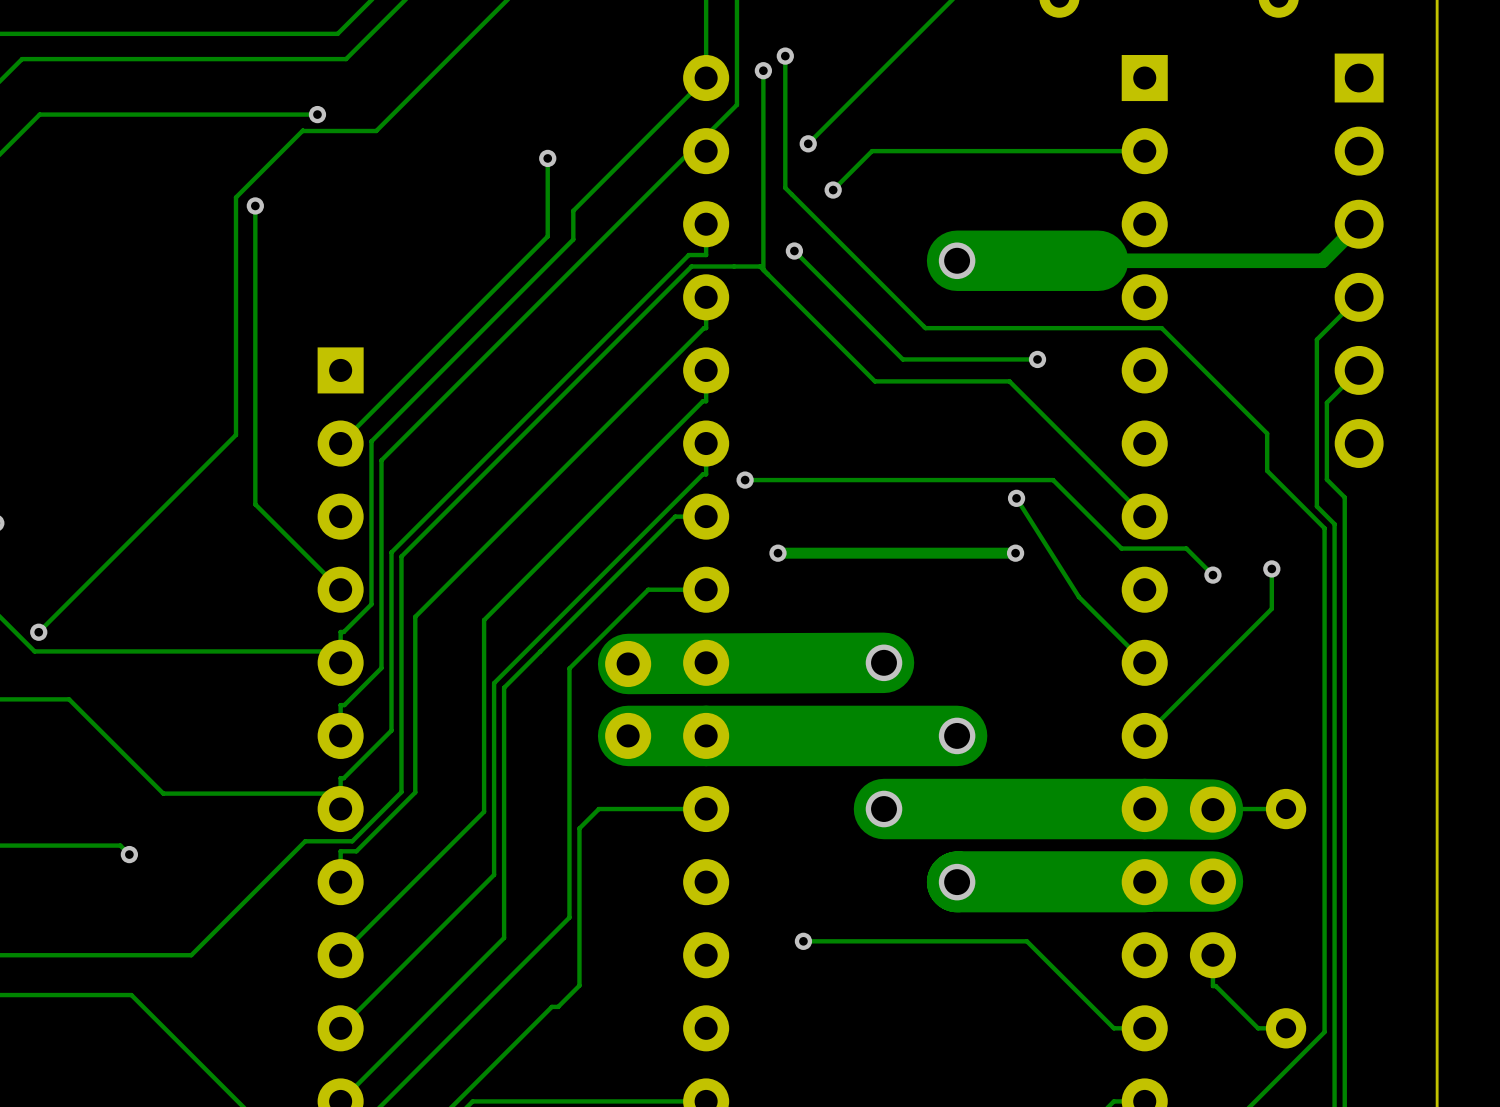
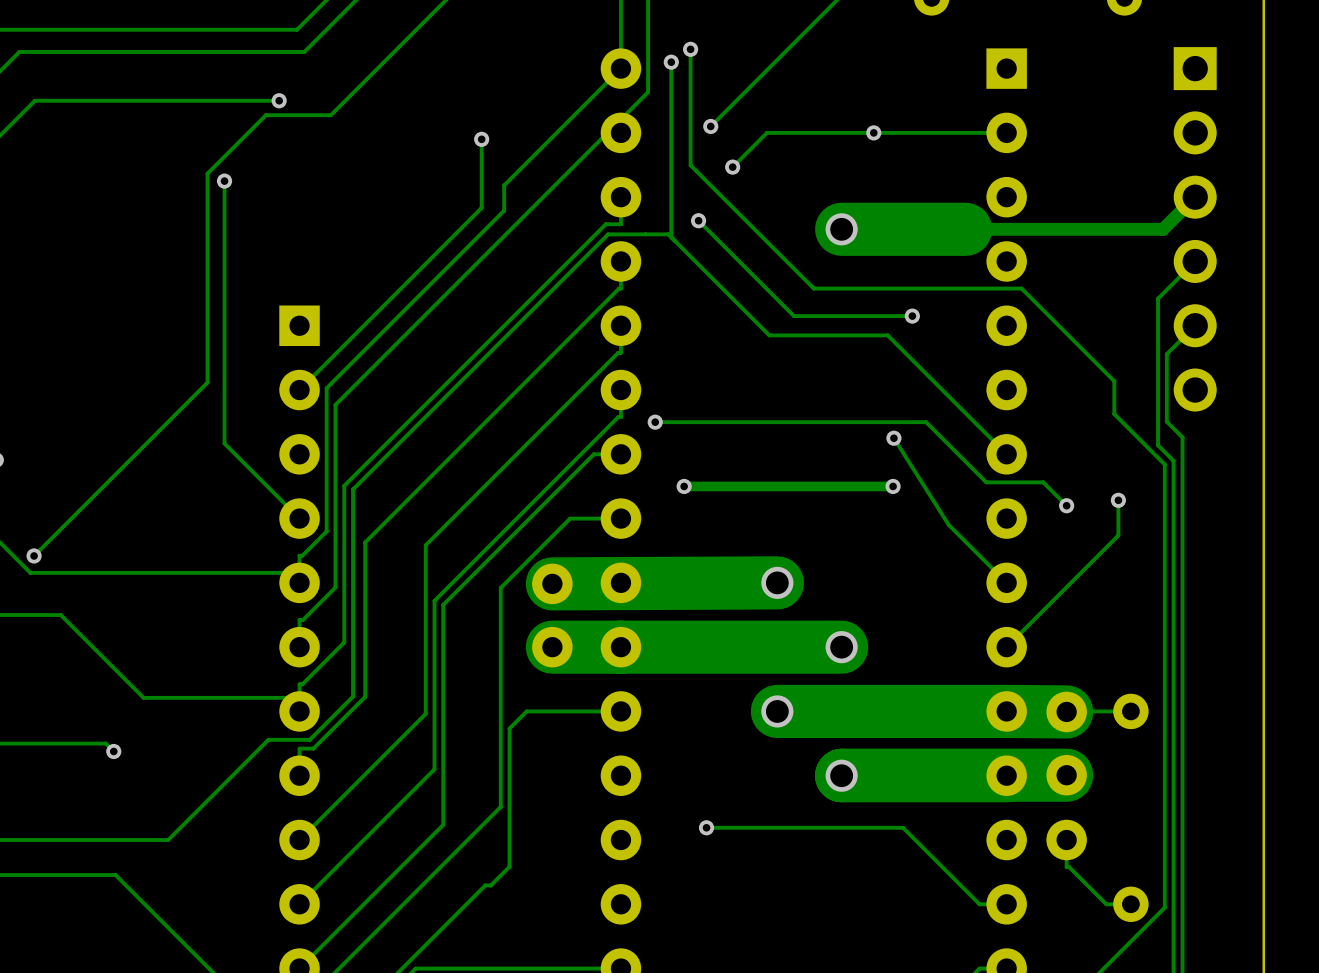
via: none -> (873, 132)

